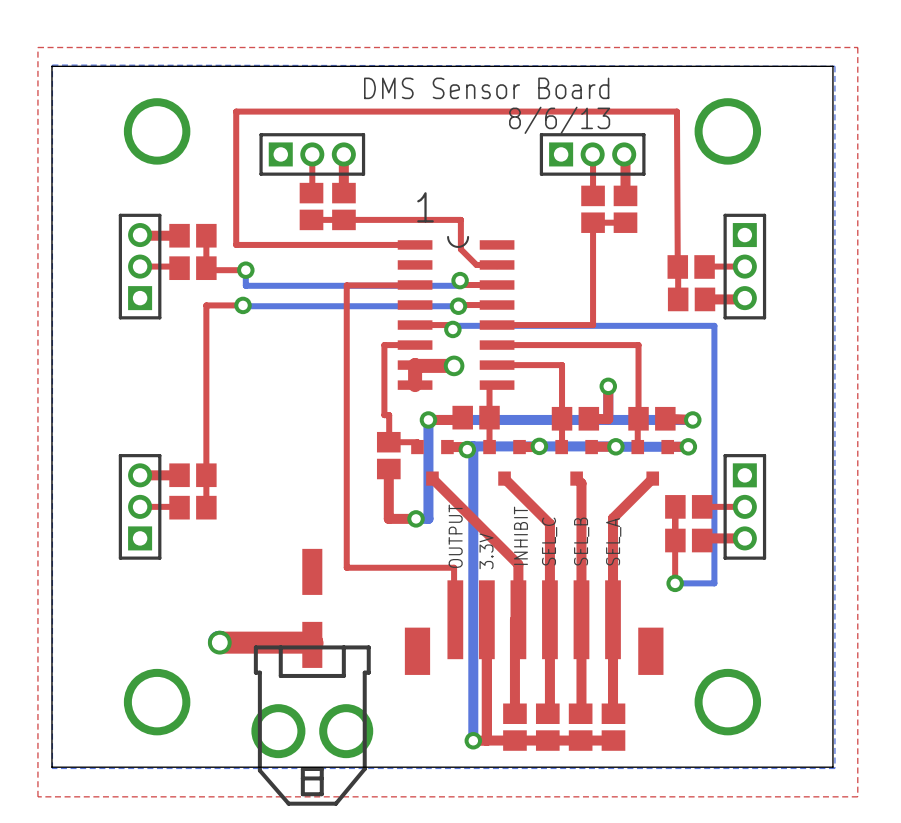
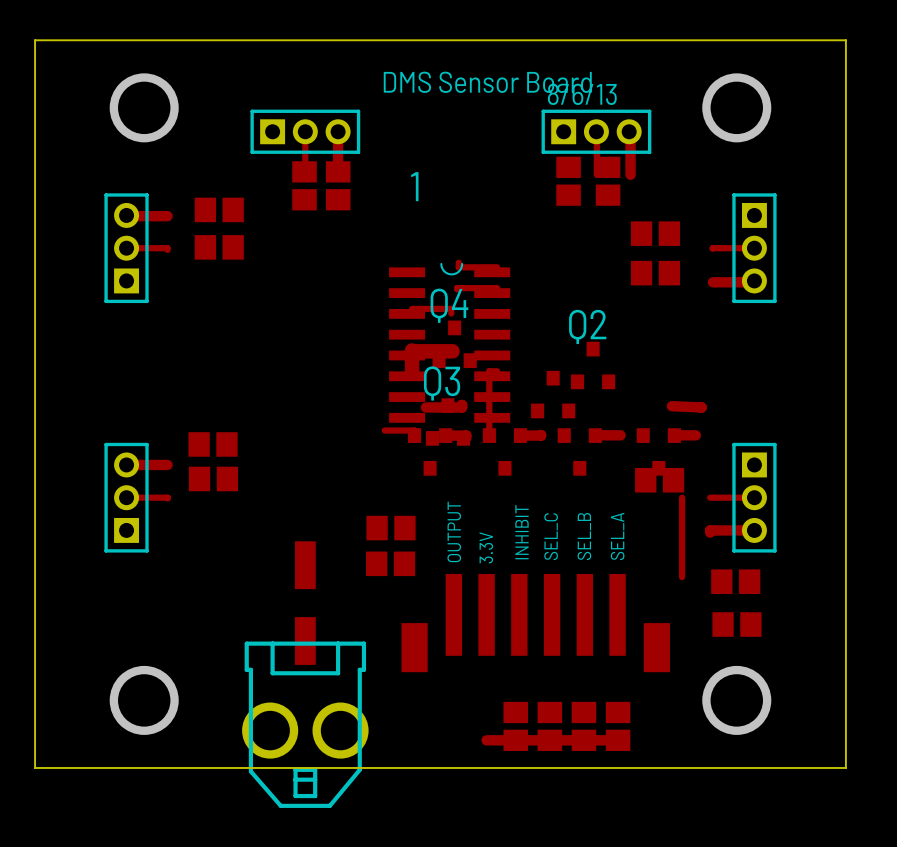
top zone outline: (37, 47) (857, 47) (857, 796) (37, 796) (37, 47) -> none
bottom zone outline: (52, 65) (52, 768) (834, 768) (834, 66) (52, 65) -> none
text position: DMS Sensor Board (486, 88) -> DMS Sensor Board (487, 82)
part: none -> (568, 181)
part: none -> (608, 181)
part: (593, 209) -> none
part: (625, 209) -> none
top track: (311, 219) (460, 219) (460, 249) (476, 264) (497, 266) -> none
top track: (625, 222) (593, 222) (593, 325) (497, 325) -> none
part: none -> (219, 209)
part: (192, 235) -> none
top track: (206, 235) (206, 270) (245, 270) -> none
top track: (415, 244) (236, 244) (236, 111) (676, 111) (678, 299) -> none
part: none -> (655, 233)
part: none -> (219, 247)
part: (691, 266) -> none
part: (192, 268) -> none
bottom track: (245, 270) (245, 285) (460, 285) (460, 280) -> none
via: (245, 270) -> none
via: (460, 280) -> none
top track: (415, 285) (346, 285) (346, 567) (454, 567) (455, 619) -> none
part: none -> (655, 273)
part: (691, 299) -> none
top track: (243, 305) (206, 305) (206, 507) -> none
bottom track: (243, 305) (458, 306) -> none
via: (243, 305) -> none
via: (458, 306) -> none
part position: (456, 312) -> (449, 342)
bottom track: (452, 329) (452, 325) (714, 325) (714, 583) (675, 583) -> none
via: (452, 329) -> none
top track: (415, 345) (384, 345) (384, 415) (389, 415) (389, 442) -> none
top track: (497, 345) (638, 345) (637, 447) -> none
Q4: none -> (454, 344)
via: (454, 365) -> none
top track: (497, 365) (562, 365) (561, 447) -> none
Q2: none -> (593, 365)
top track: (608, 386) (608, 419) (588, 418) -> none
via: (608, 386) -> none
part: none -> (553, 394)
part: (476, 417) -> none
part: (575, 418) -> none
part: (651, 418) -> none
via: (428, 419) -> none
bottom track: (692, 419) (428, 419) (428, 518) (416, 518) -> none
via: (692, 419) -> none
Q3: none -> (447, 422)
via: (539, 446) -> none
via: (615, 446) -> none
bottom track: (688, 446) (615, 446) (467, 446) (467, 449) (473, 446) (473, 740) -> none
via: (688, 446) -> none
via: (467, 449) -> none
part: none -> (213, 444)
part: (388, 455) -> none
top track: (388, 469) (388, 518) (416, 518) -> none
part: (192, 475) -> none
top track: (432, 478) (518, 564) (518, 619) (514, 619) (514, 713) -> none
top track: (504, 478) (549, 523) (549, 713) (547, 713) -> none
top track: (576, 478) (581, 483) (580, 713) -> none
top track: (652, 478) (613, 518) (613, 713) -> none
part: none -> (213, 478)
part: none -> (659, 480)
part: (688, 506) -> none
part: (192, 507) -> none
via: (416, 518) -> none
part: none -> (391, 528)
part: (688, 540) -> none
part: none -> (390, 563)
via: (675, 583) -> none
part: none -> (735, 581)
top track: (486, 619) (486, 740) (473, 740) -> none
part: none -> (736, 624)
top track: (219, 642) (312, 642) (312, 644) -> none
via: (219, 642) -> none
via: (473, 740) -> none

